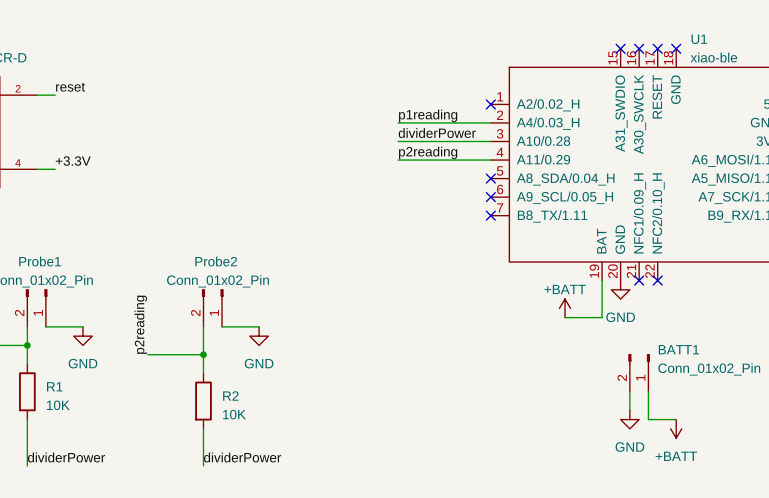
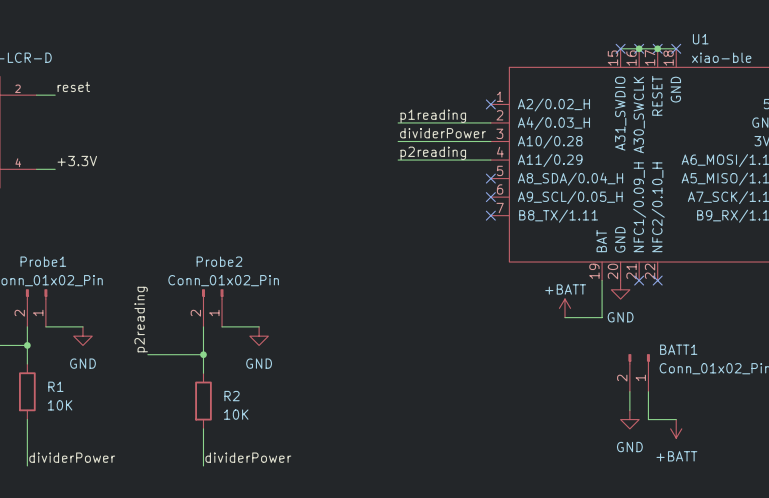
wire: none -> (620, 48) (676, 48)
junction: none -> (639, 48)
junction: none -> (657, 48)

